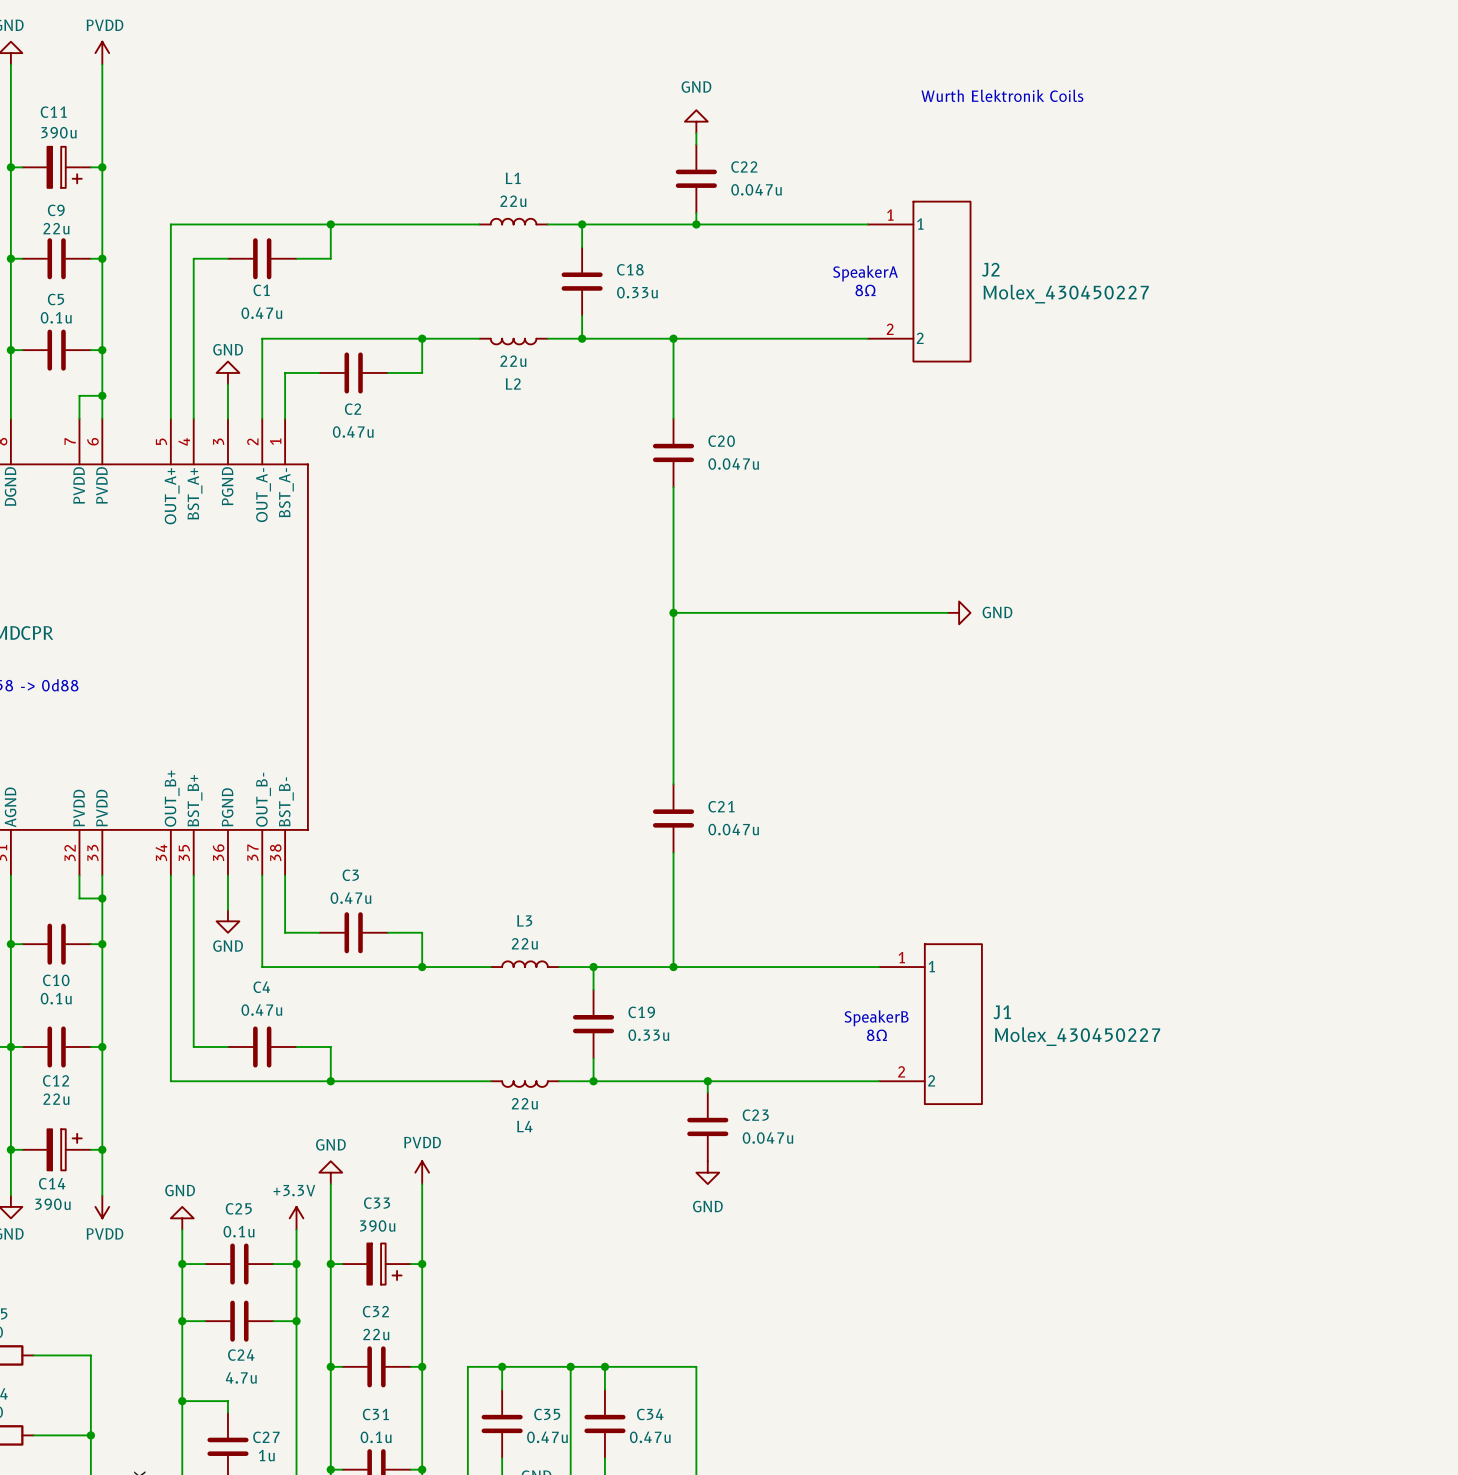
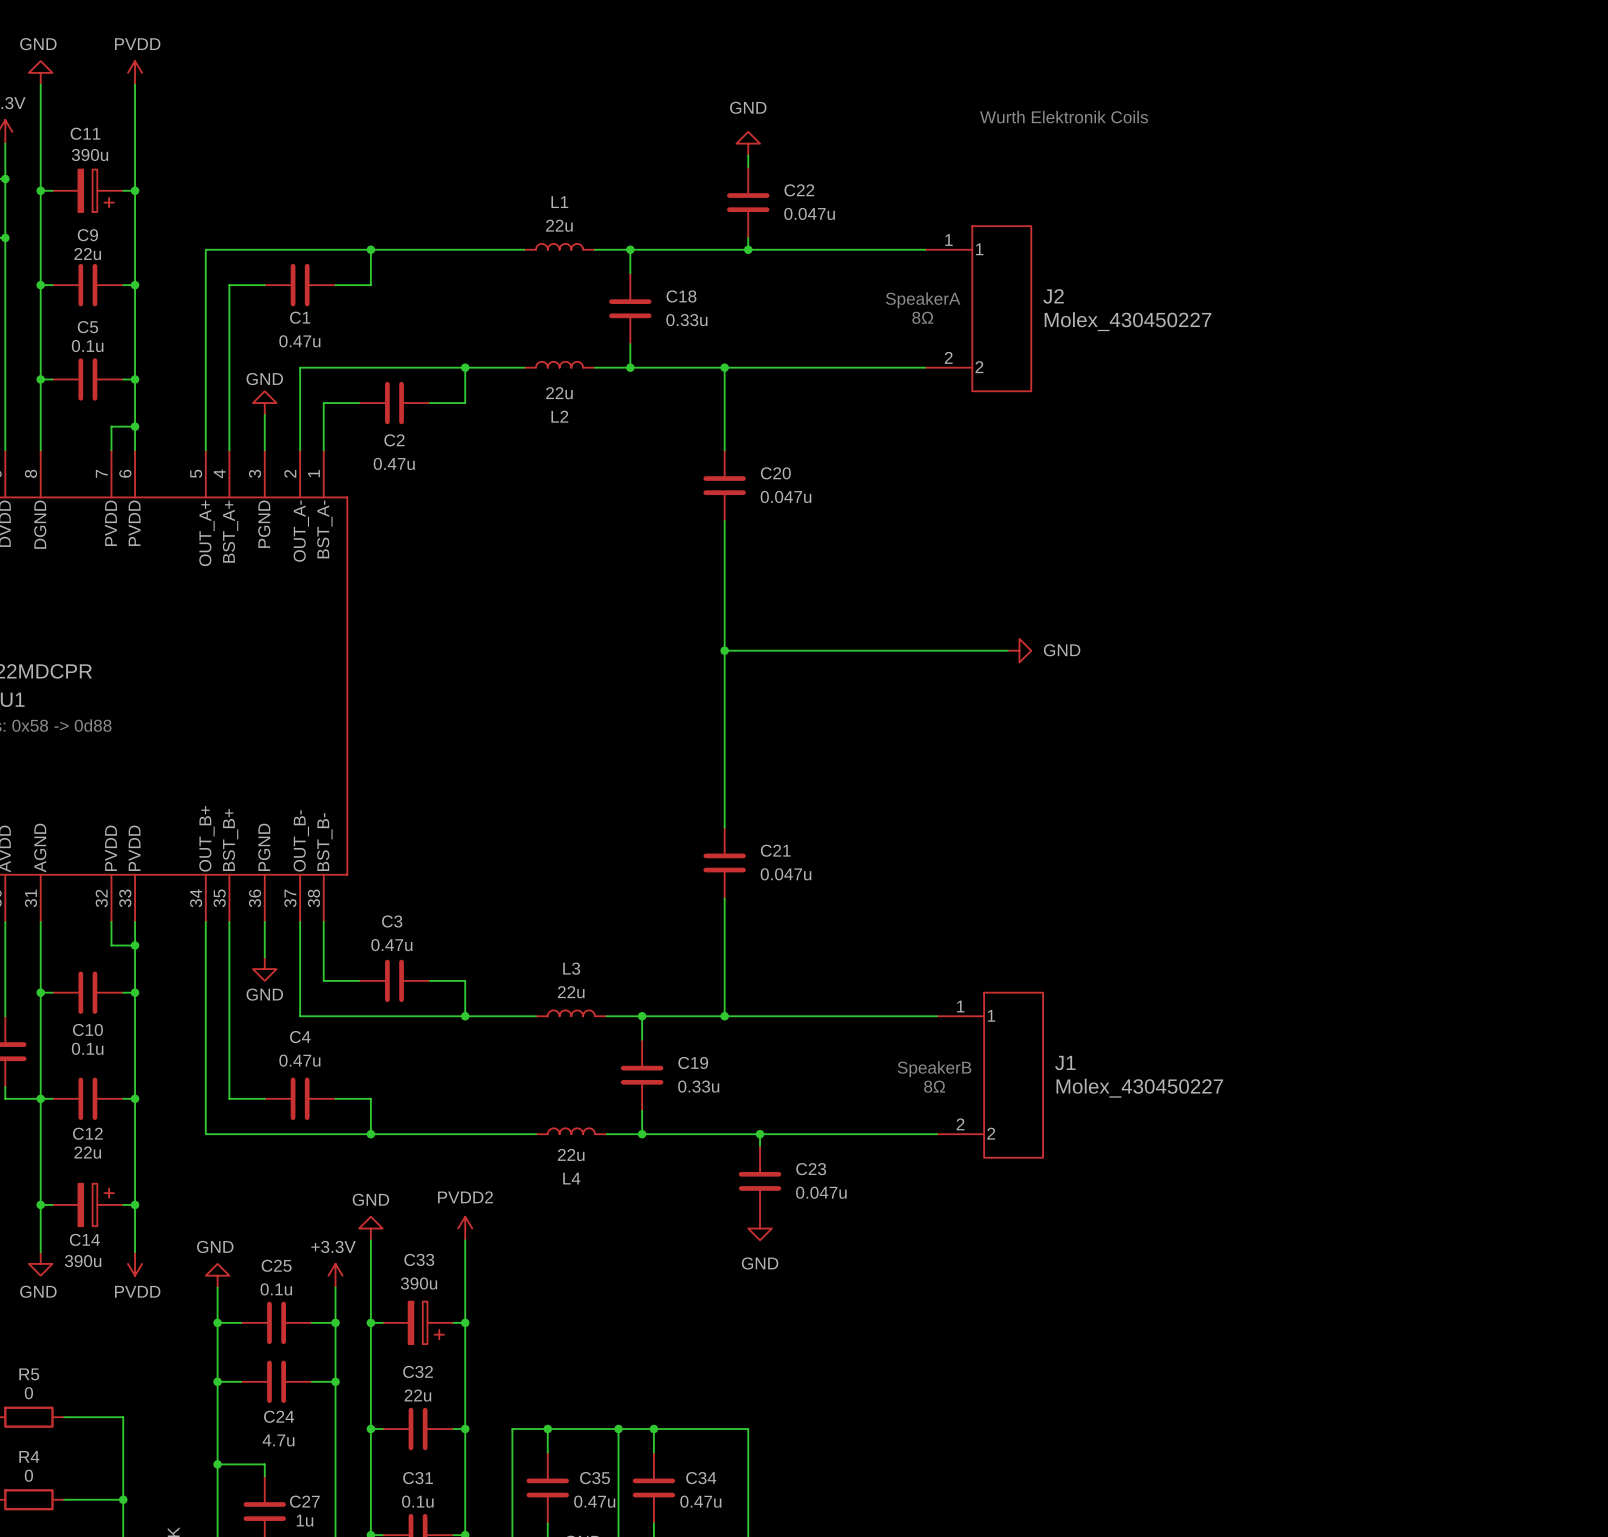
L2 rotation: 0° (513, 341) -> 180° (559, 364)
L4 rotation: 0° (525, 1084) -> 180° (571, 1131)
power symbol: PVDD (422, 1172) -> PVDD2 (465, 1228)

